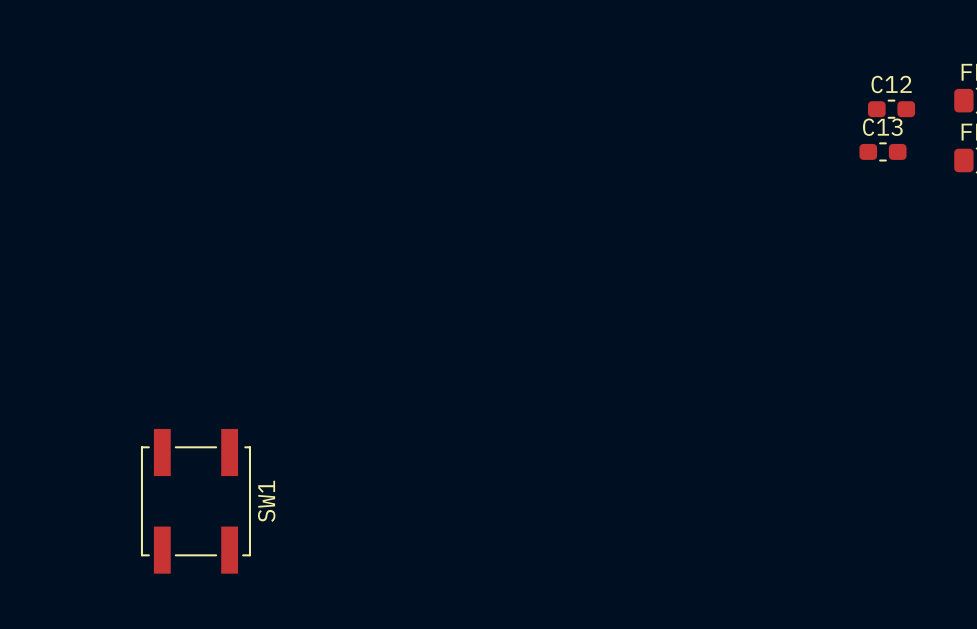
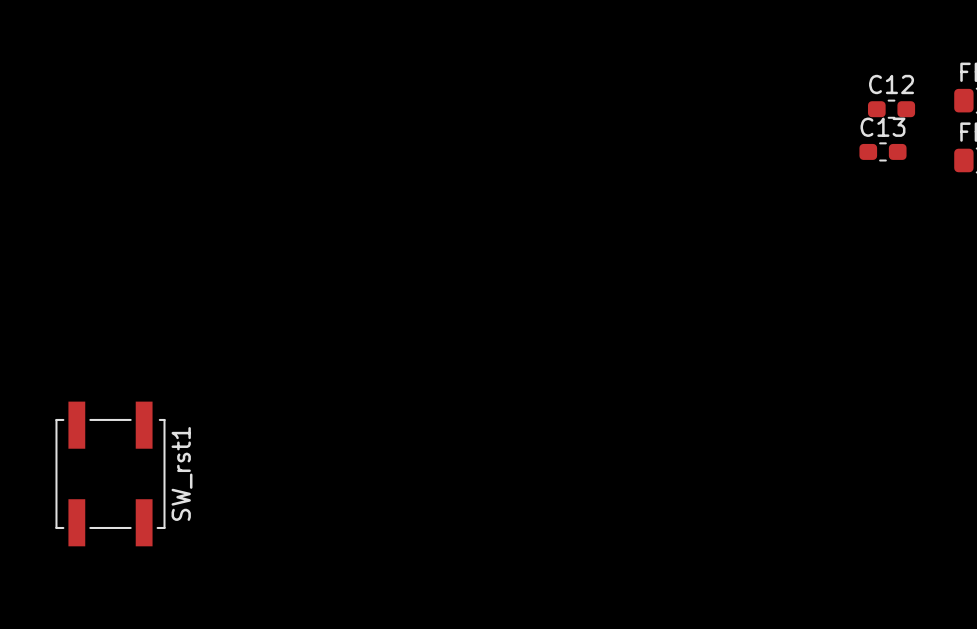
SW_rst1: none -> (110, 473)
SW1: (195, 501) -> none

